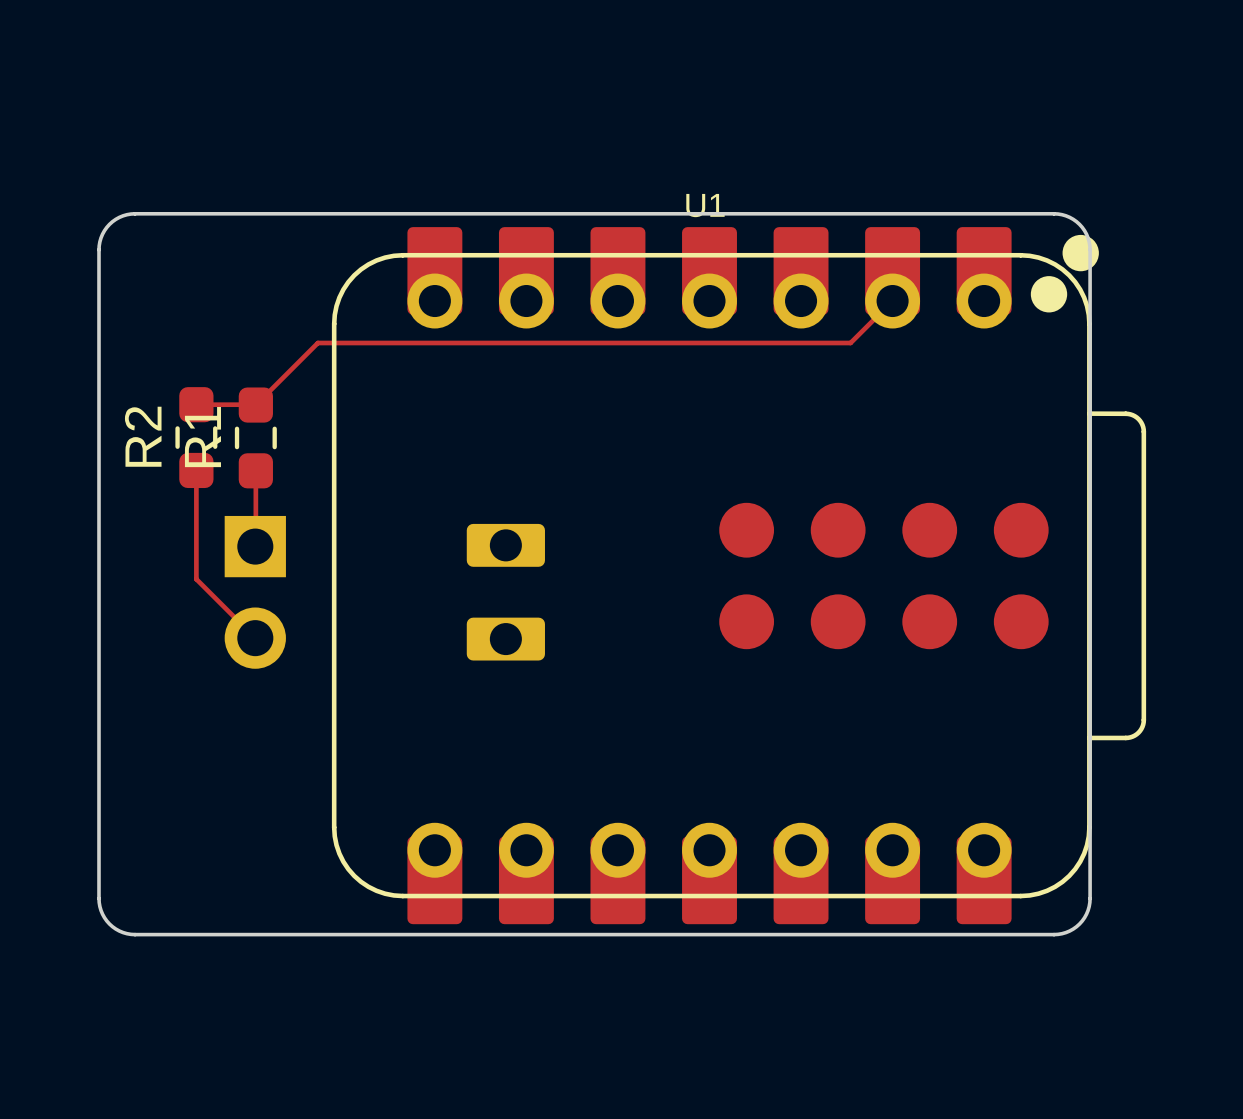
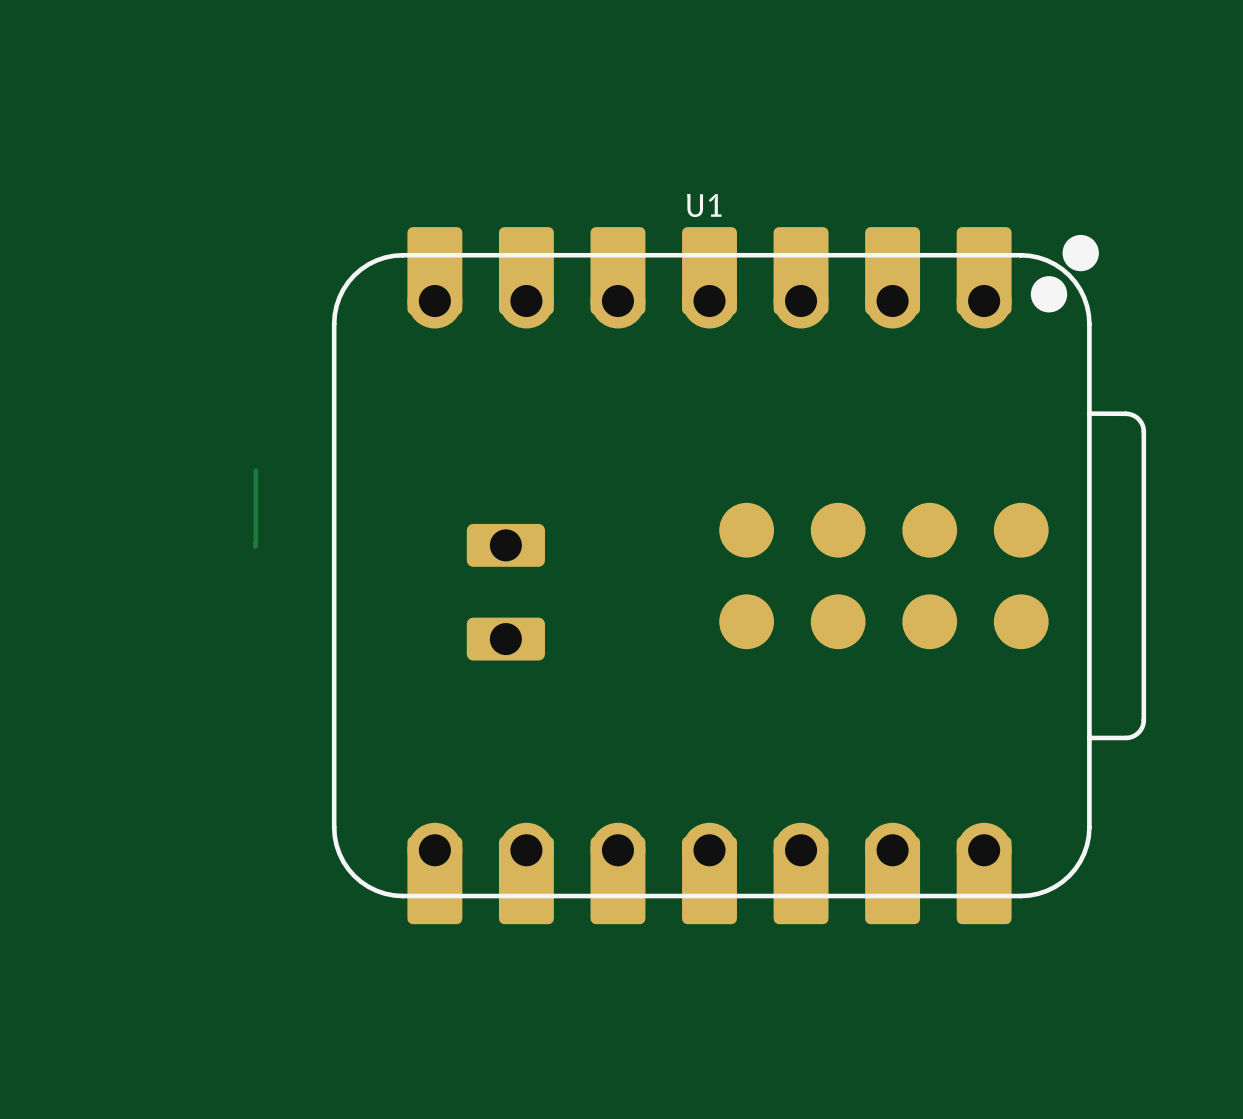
board edge: (135, 213) (1054, 213) (1065, 215) (1076, 221) (1086, 234) (1090, 249) (1090, 898) (1088, 910) (1082, 921) (1069, 931) (1054, 934) (135, 934) (123, 932) (112, 926) (102, 914) (98, 898) (98, 249) (102, 234) (109, 224) (123, 215) (135, 213) -> none
track: (892, 301) (850, 343) (317, 343) (255, 405) -> none
track: (196, 404) (255, 404) -> none
R2: (196, 437) -> none
R1: (255, 437) -> none
track: (196, 470) (196, 579) (255, 638) -> none
part: (255, 592) -> none

